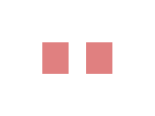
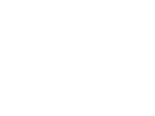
part: (77, 58) -> none

